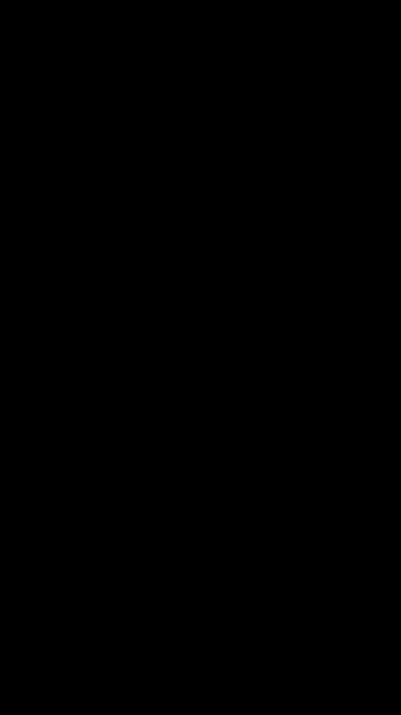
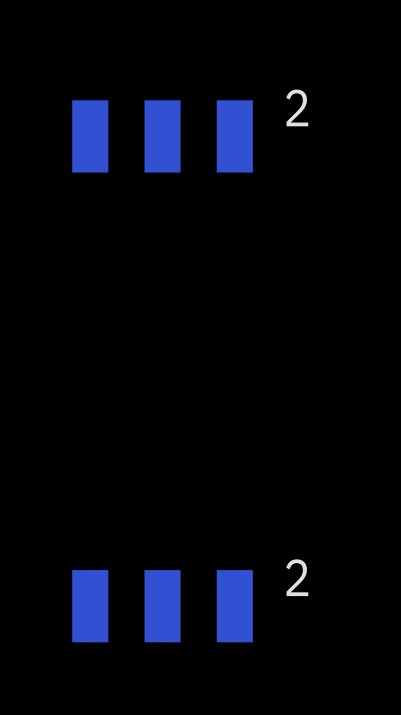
part: none -> (162, 136)
part: none -> (162, 606)

